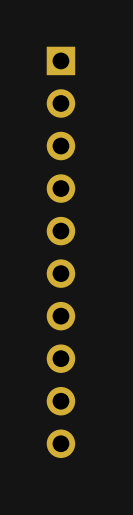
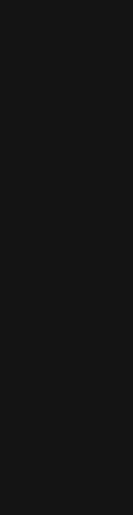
part: (60, 252) -> none

